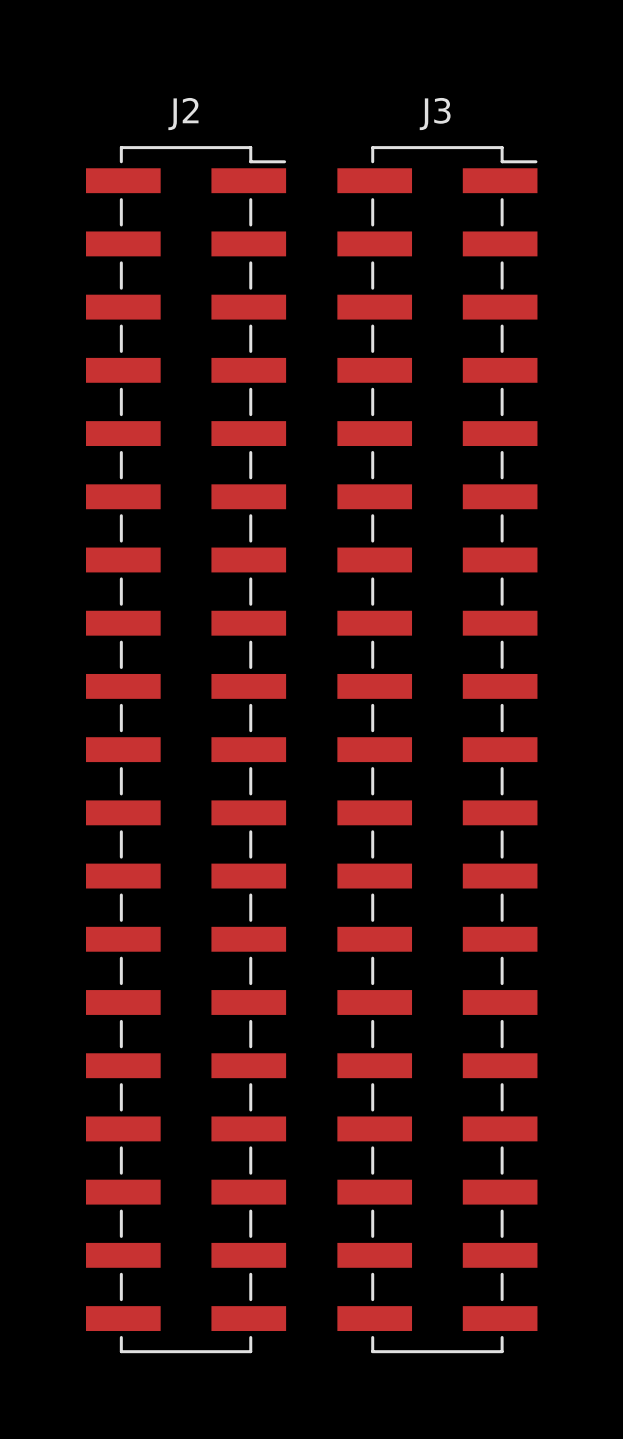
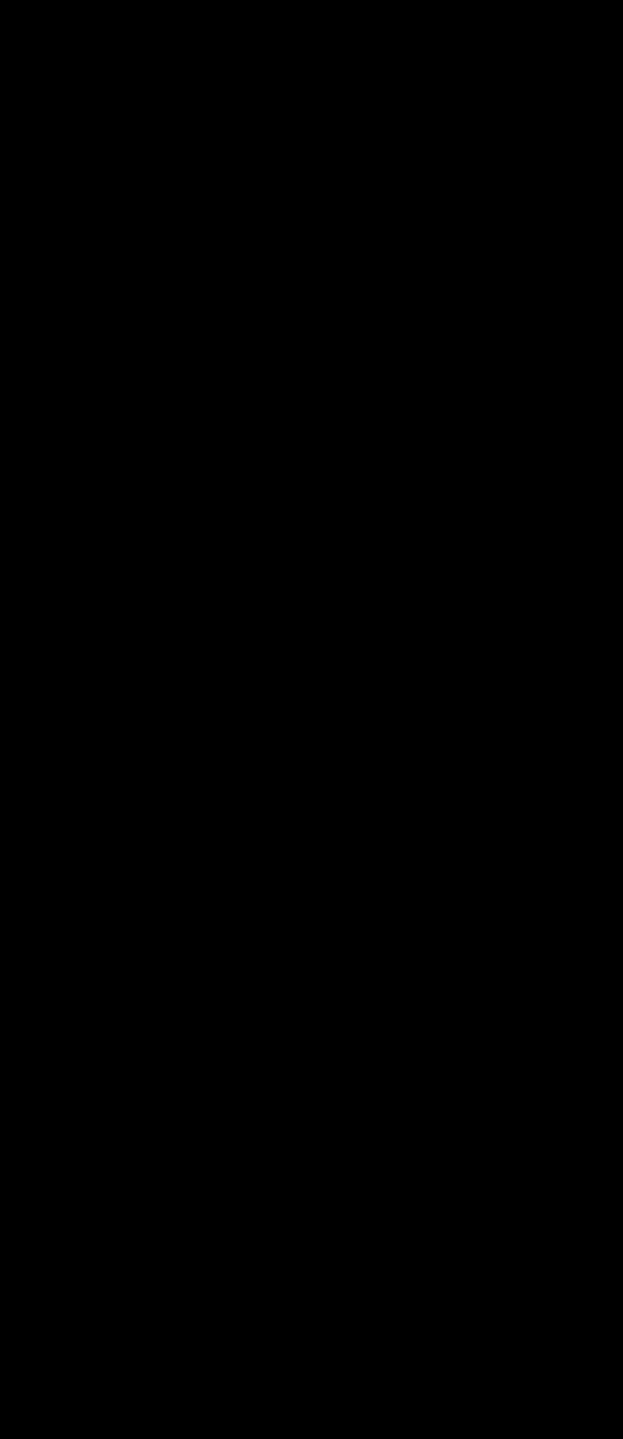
J2: (186, 749) -> none
J3: (437, 749) -> none

